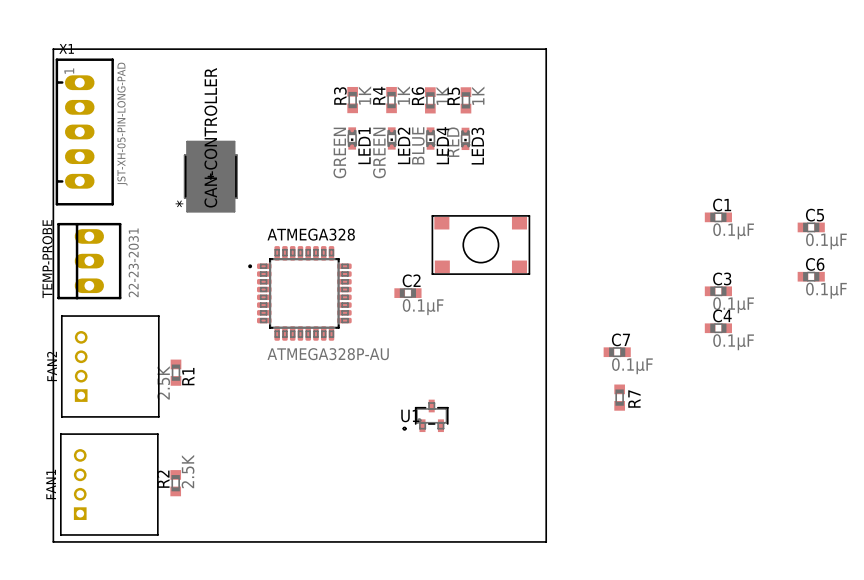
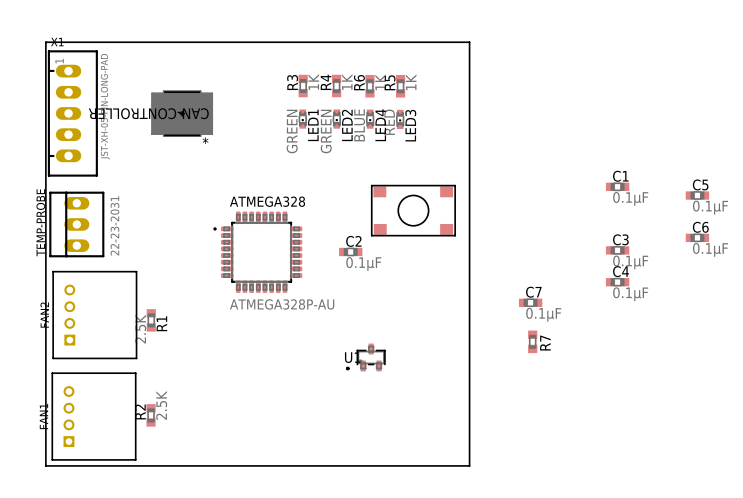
CAN-CONTROLLER rotation: 0° (210, 176) -> 90° counterclockwise (182, 113)
CAN-CONTROLLER position: (210, 176) -> (182, 113)

